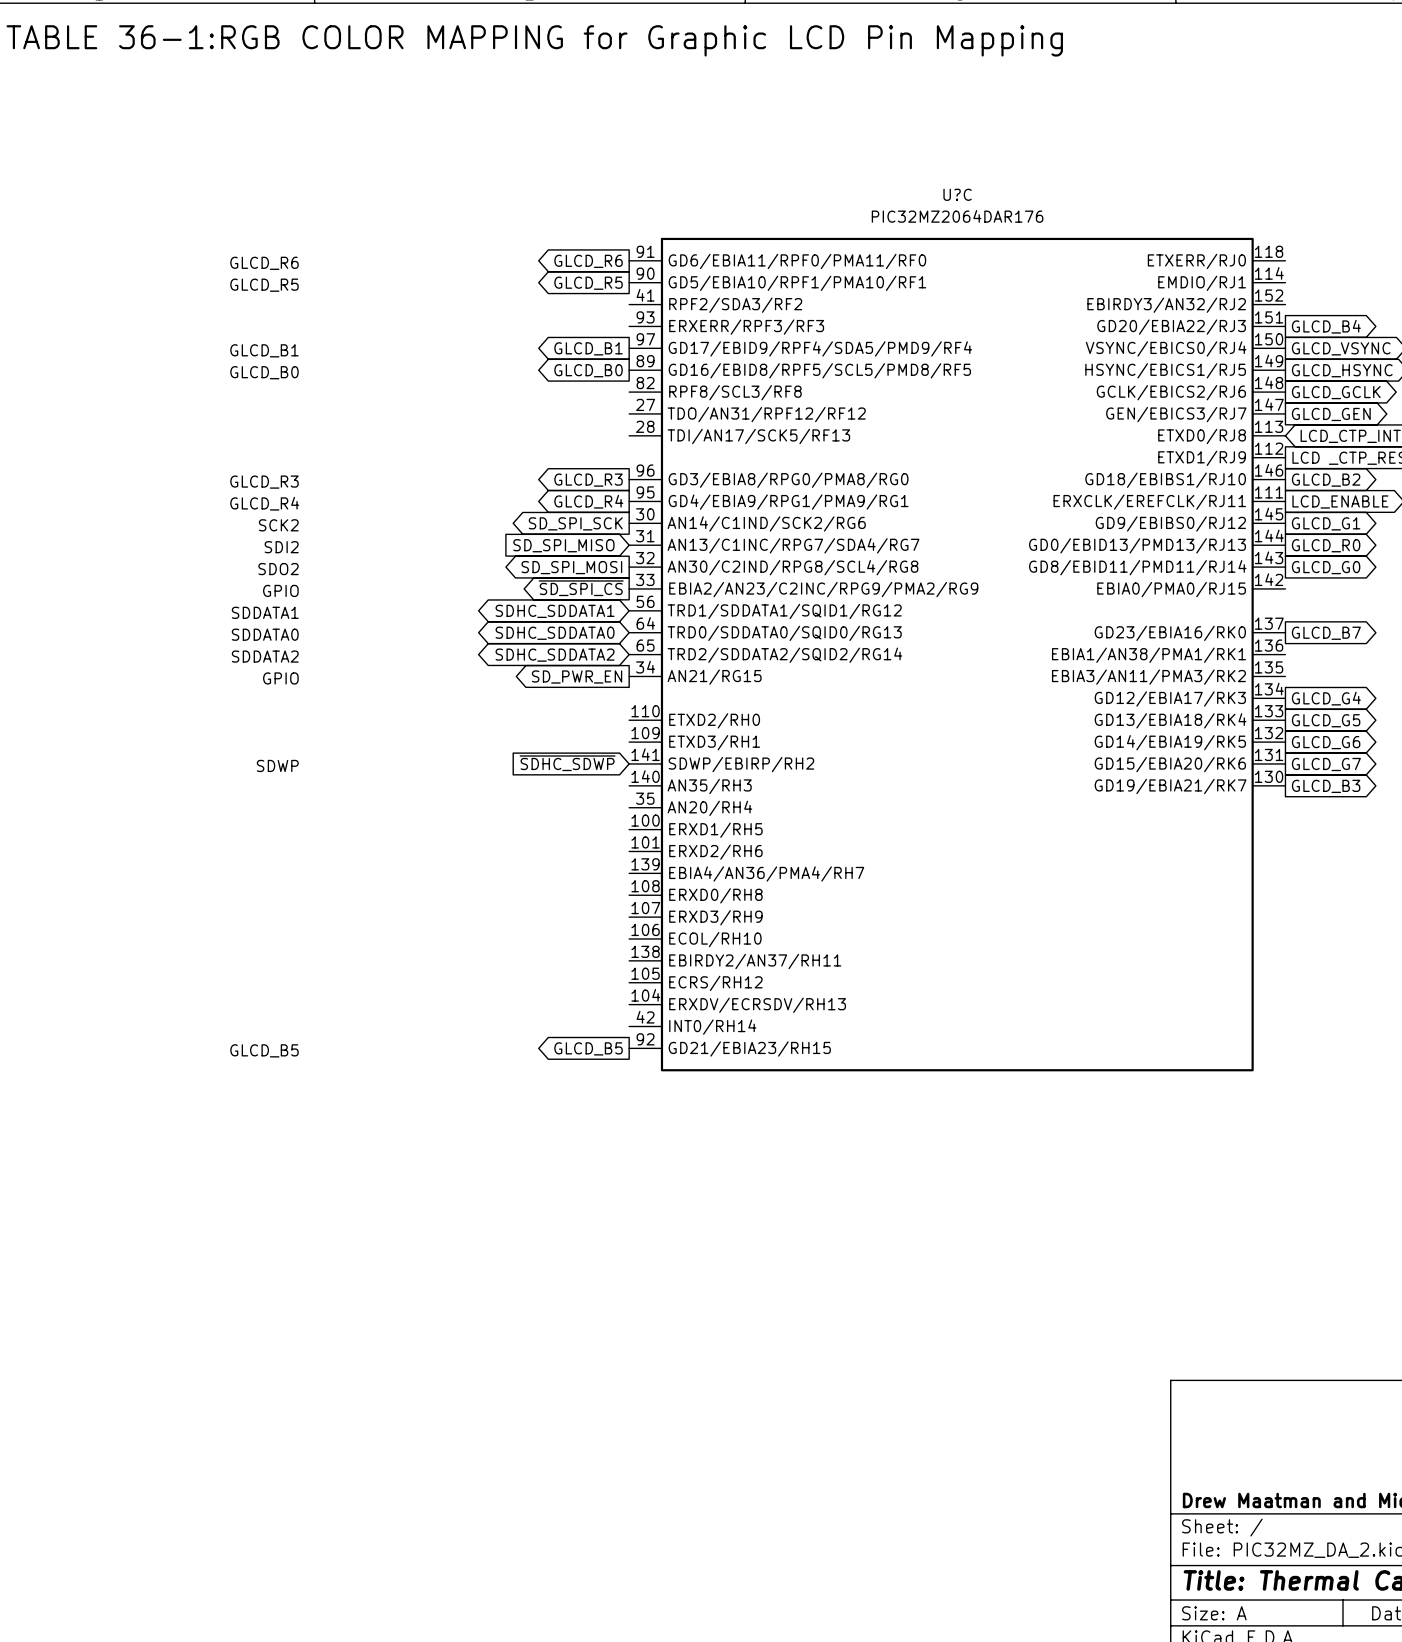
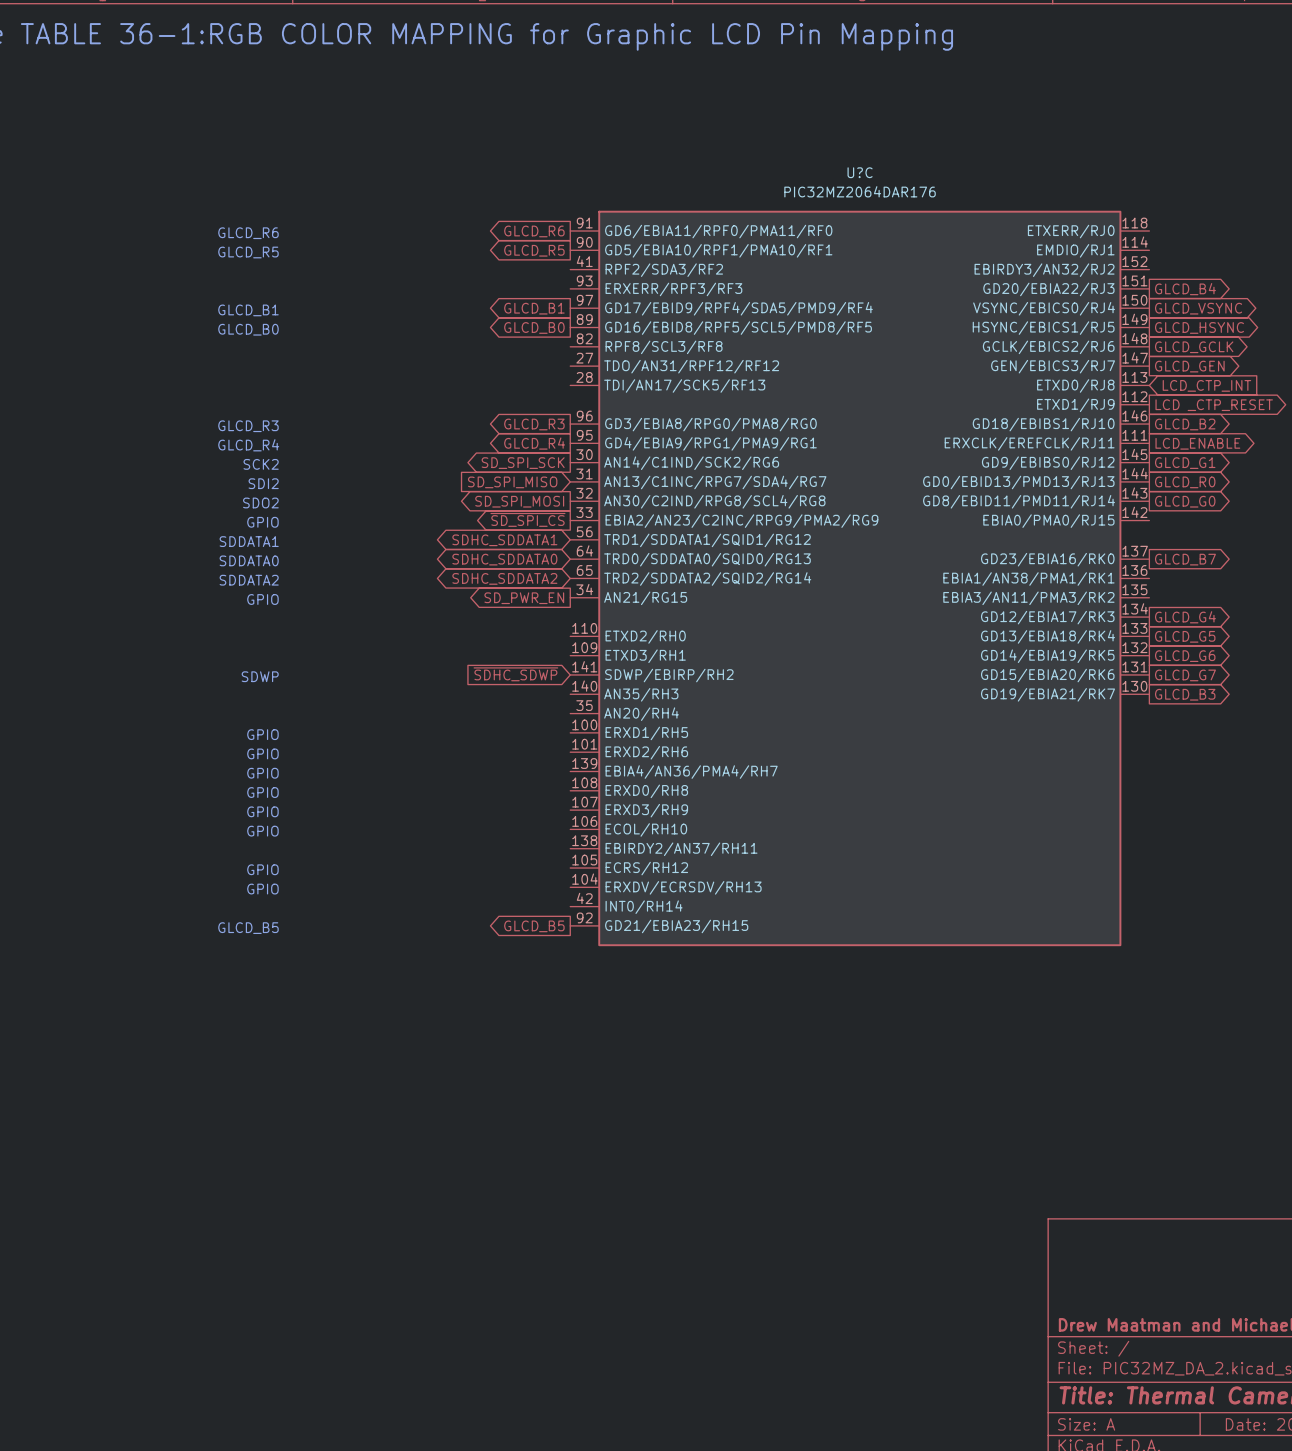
text: none -> GPIO (262, 734)
text: none -> GPIO (262, 753)
text: none -> GPIO (262, 773)
text: none -> GPIO (262, 792)
text: none -> GPIO (262, 811)
text: none -> GPIO (262, 831)
text: none -> GPIO (262, 869)
text: none -> GPIO (262, 889)

